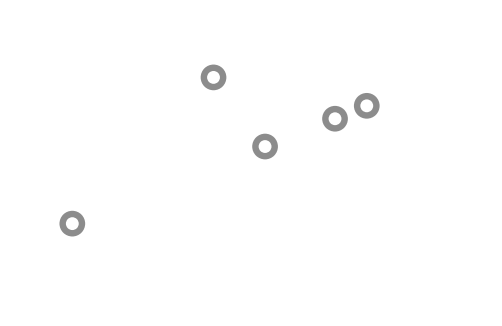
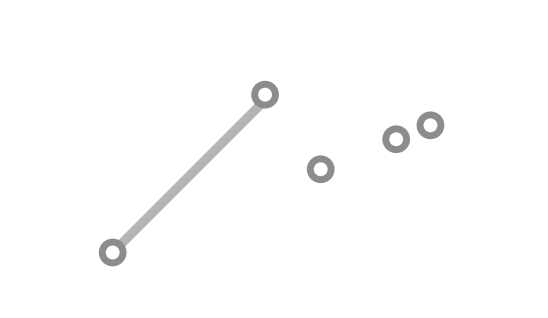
track: none -> (265, 100) (112, 252)

